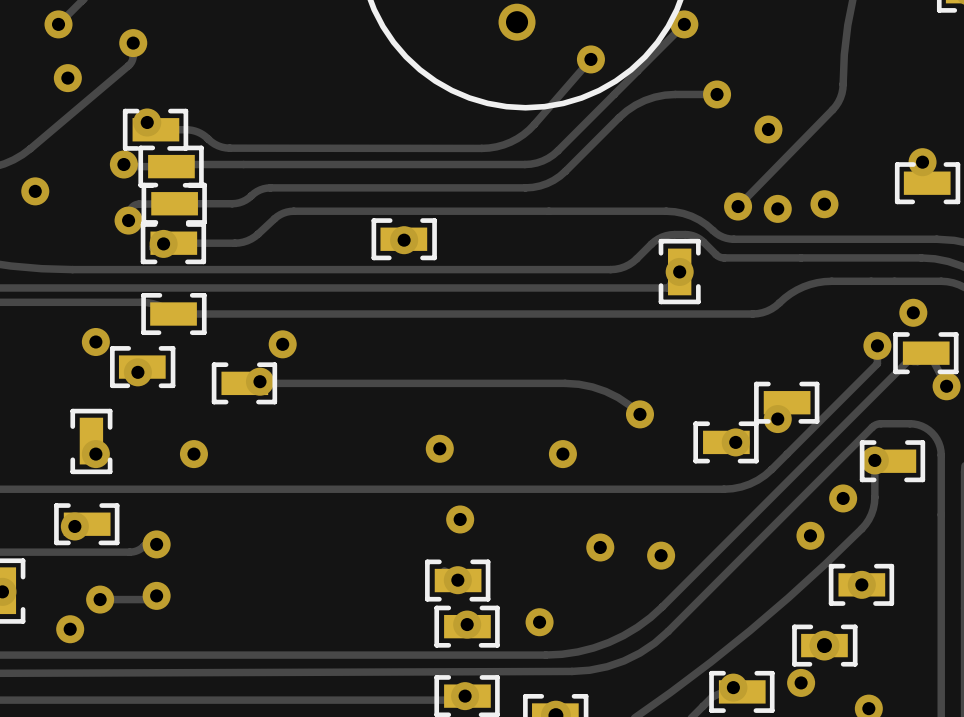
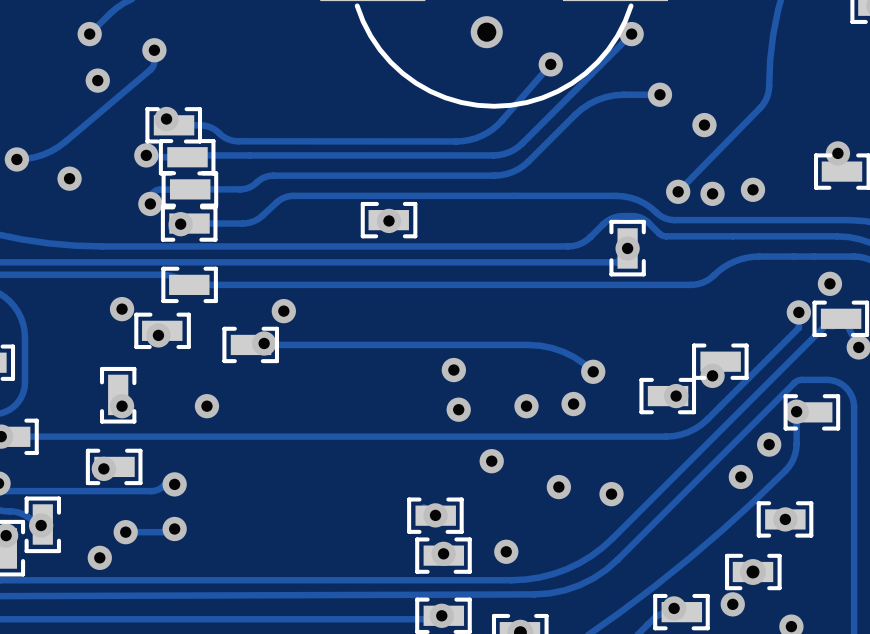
via: none -> (453, 370)
via: (439, 448) -> none
via: none -> (573, 404)
via: none -> (458, 409)
via: none -> (491, 461)
via: (460, 519) -> none

